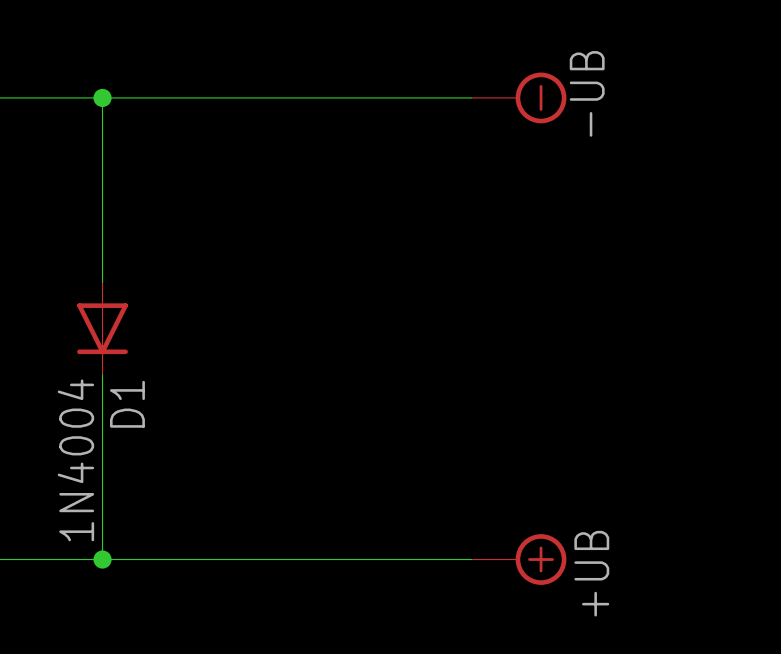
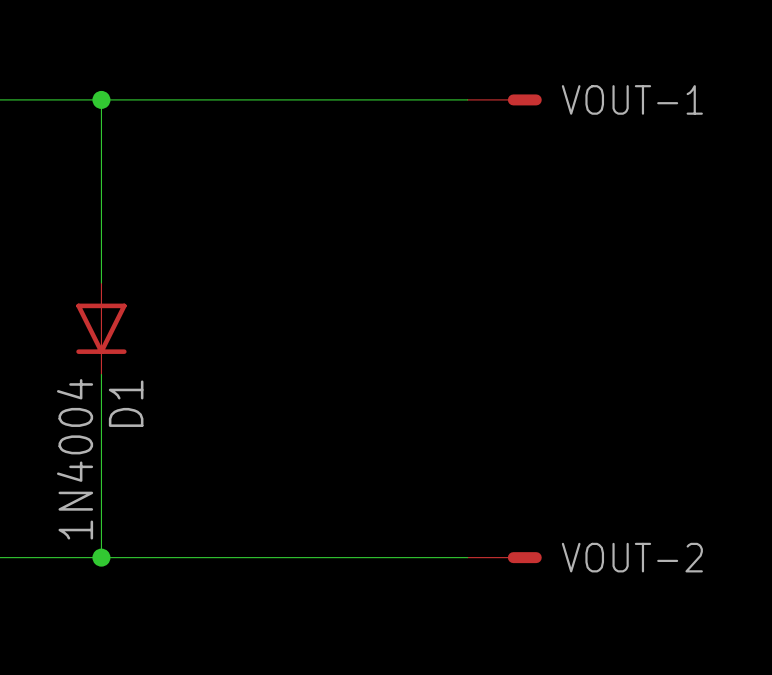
VOUT-1: none -> (504, 99)
power symbol: -UB (519, 97) -> none
VOUT-2: none -> (504, 557)
power symbol: +UB (519, 559) -> none

